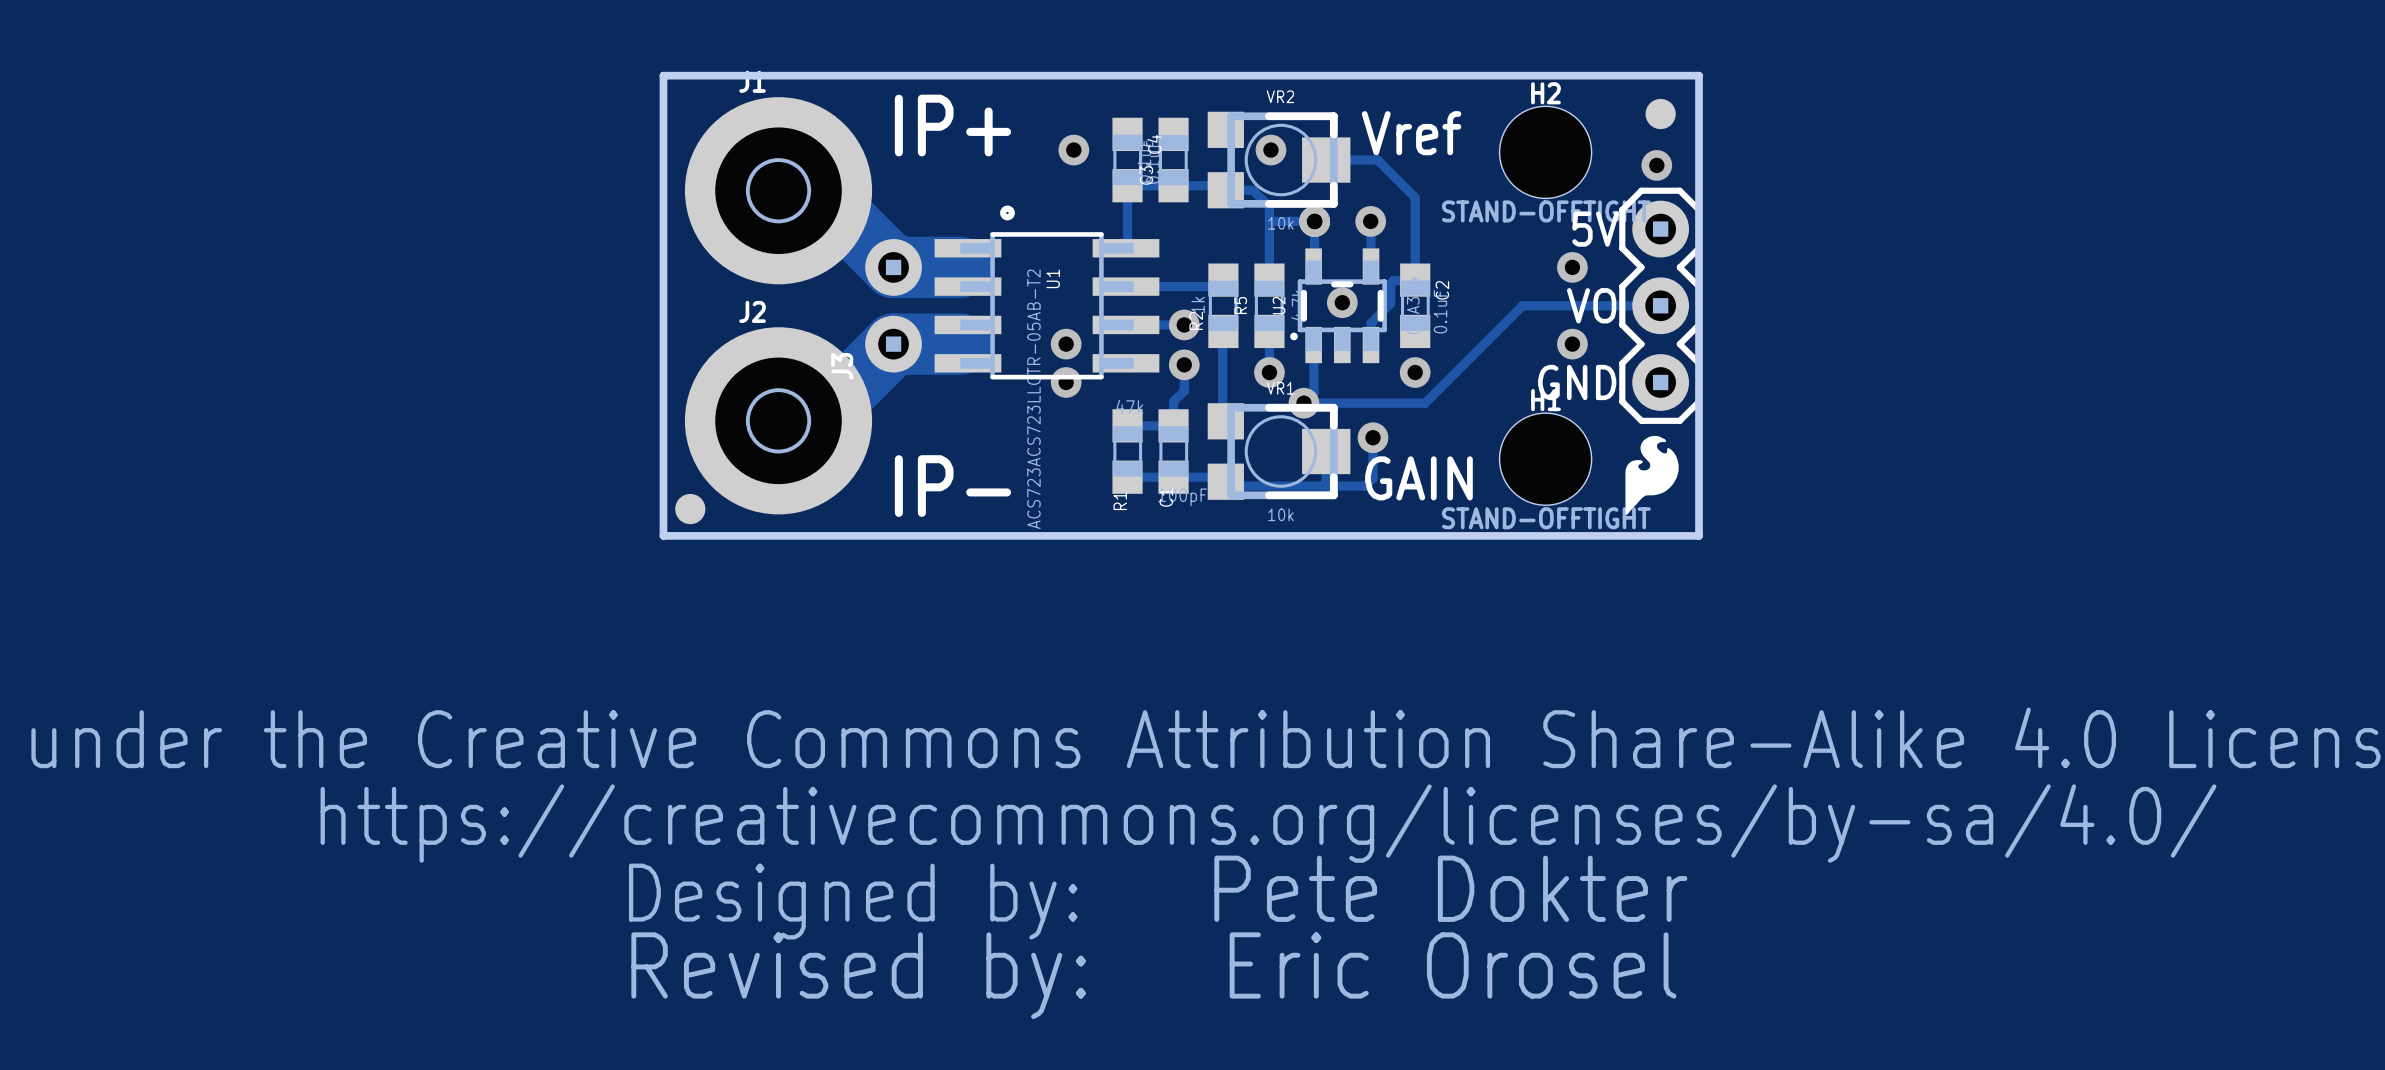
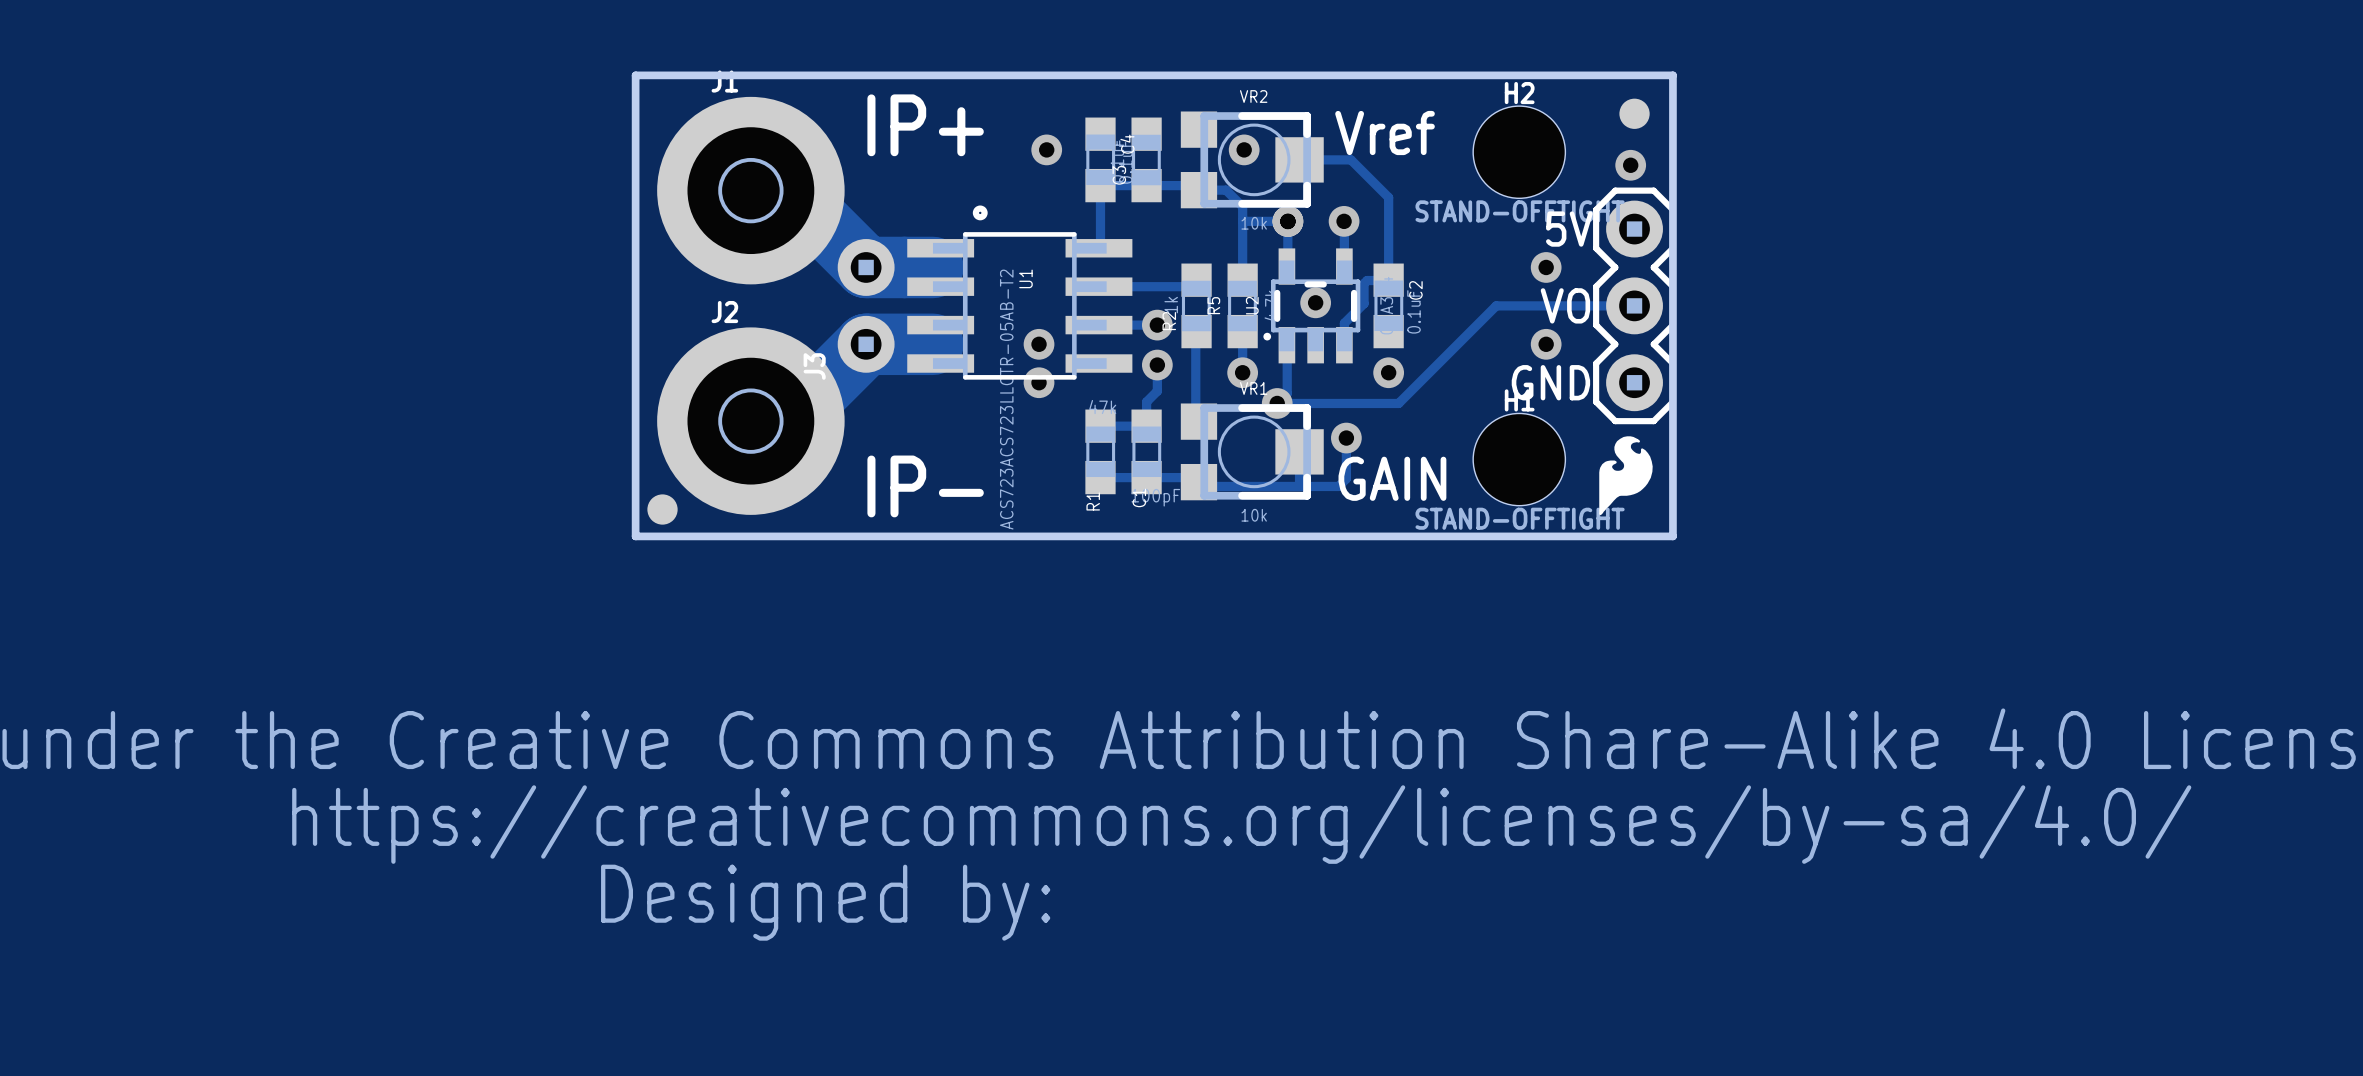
text: Pete Dokter (1450, 888) -> none
text: Eric Orosel (1453, 965) -> none
text: Revised by: (858, 975) -> none

